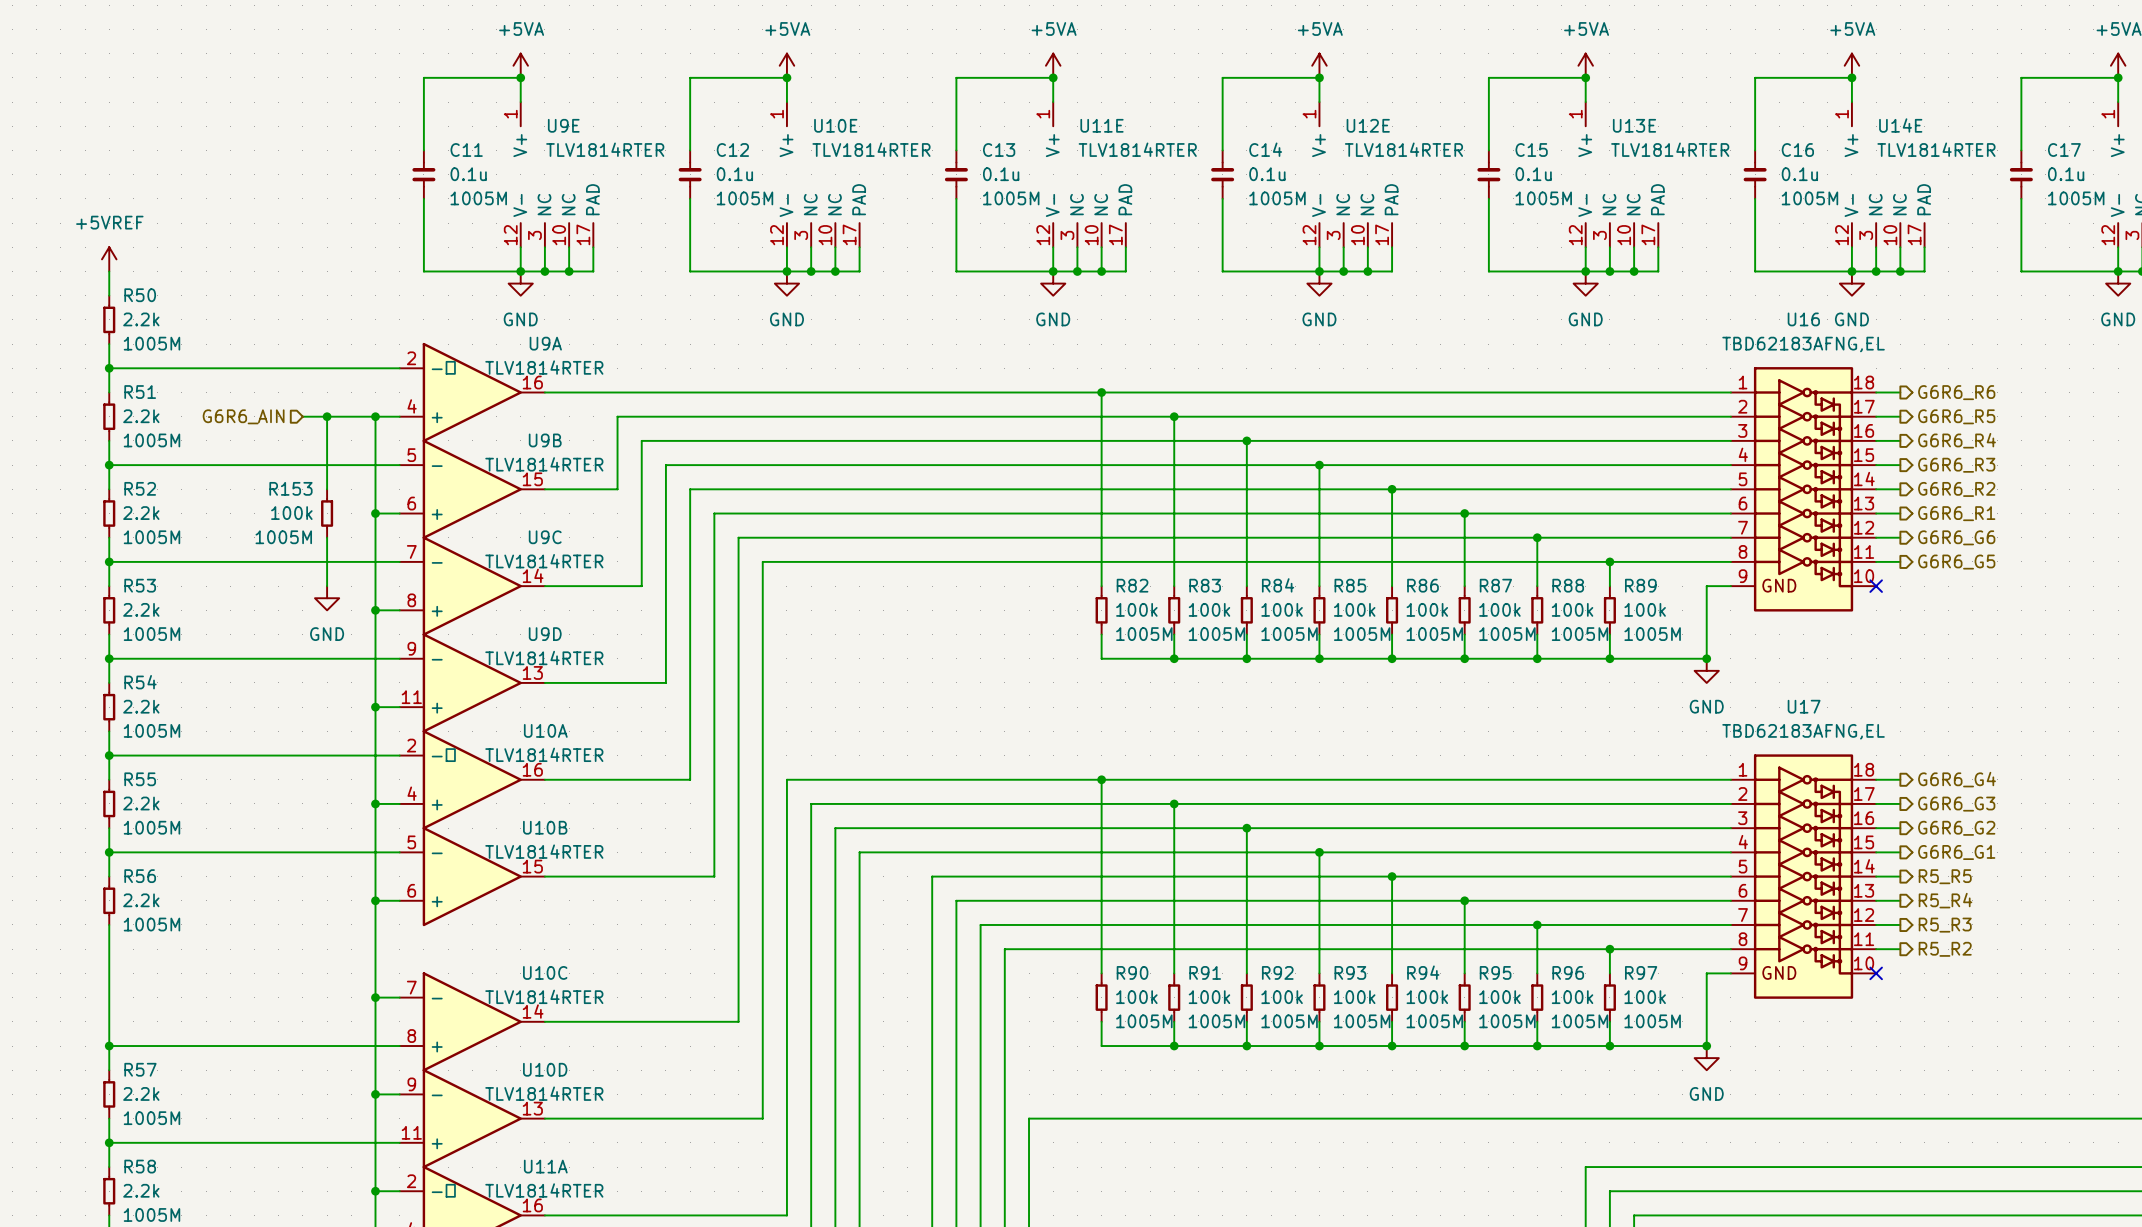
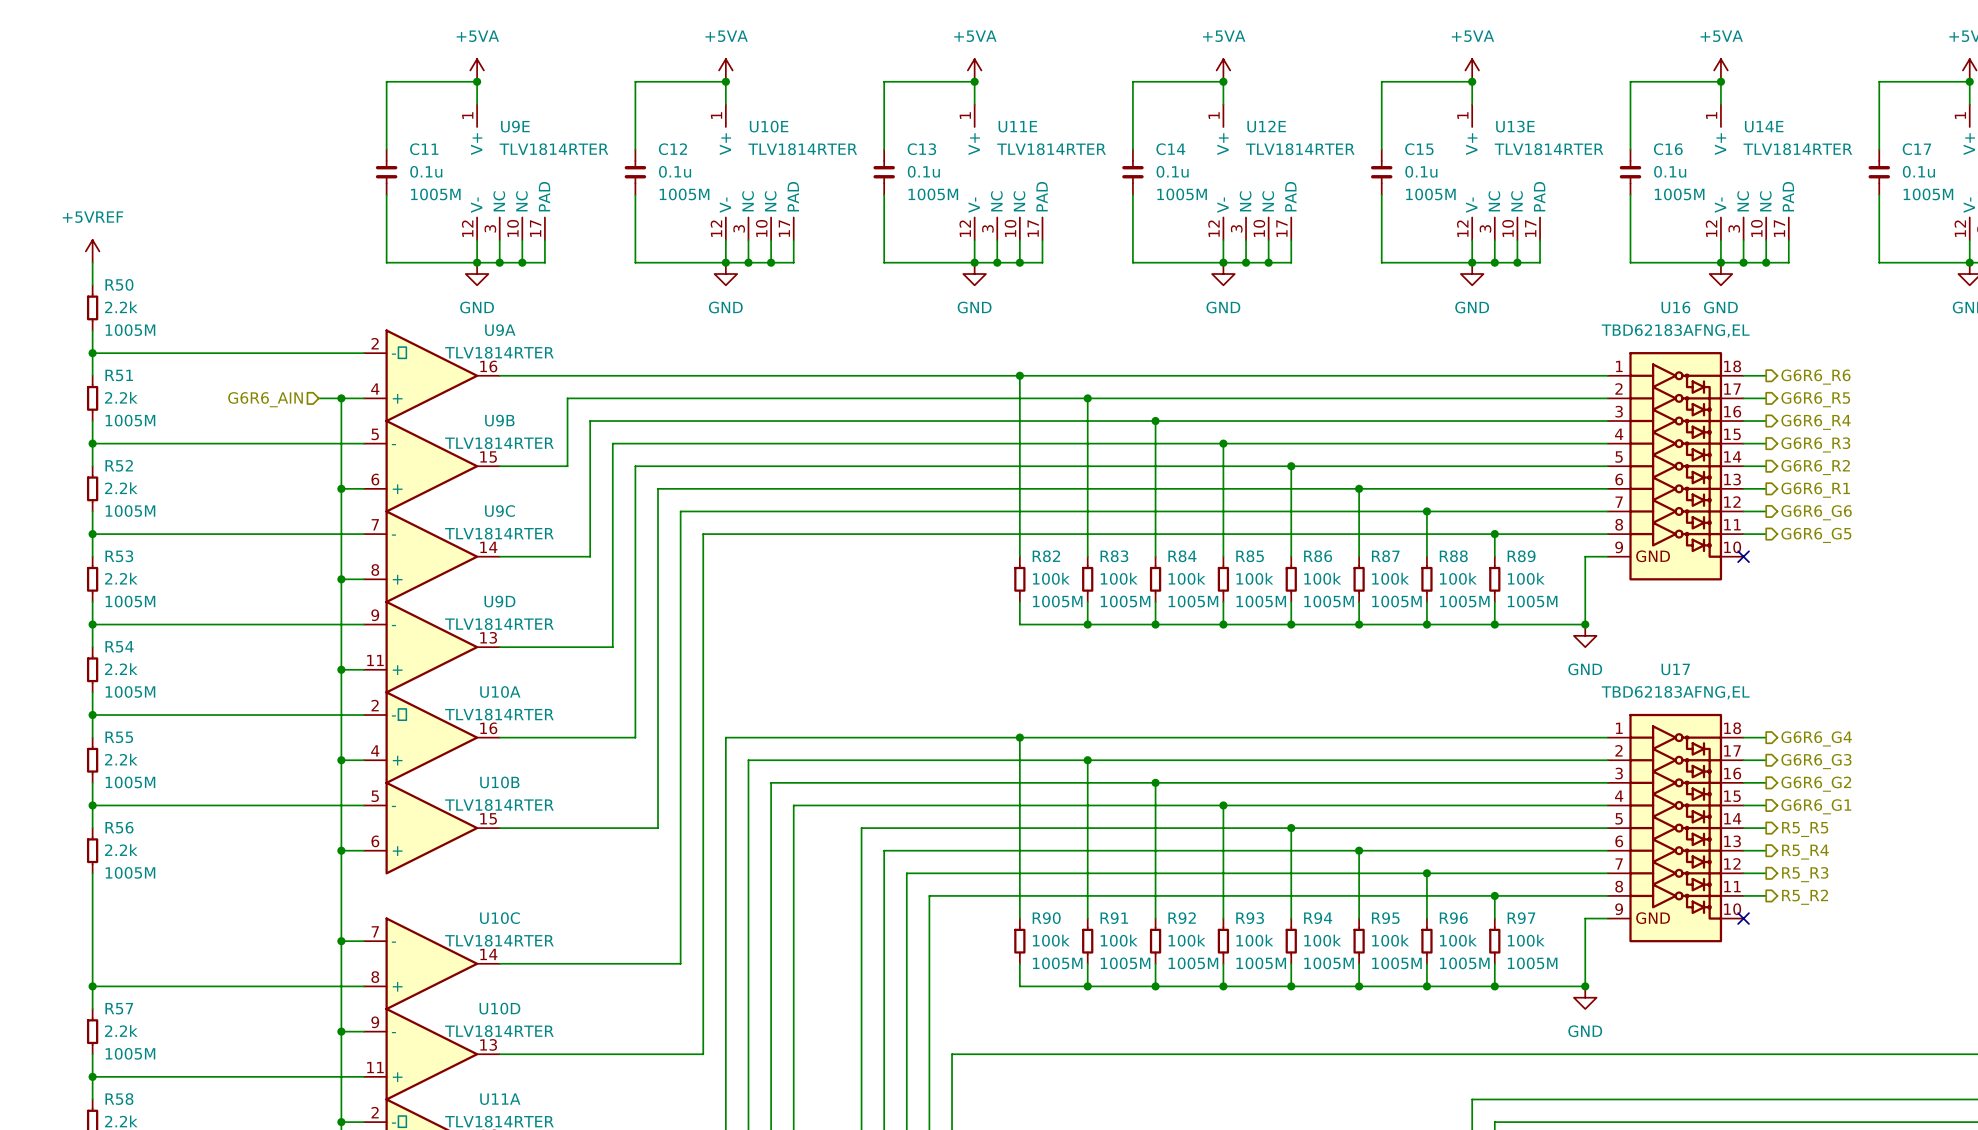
hierarchical label position: G6R6_AIN (243, 416) -> G6R6_AIN (265, 399)
wire: (302, 416) (351, 416) -> none
wire: (327, 416) (327, 489) -> none
junction: (327, 416) -> none
R153: 100k (327, 513) -> none
wire: (327, 537) (327, 586) -> none
power symbol: GND (327, 598) -> none

